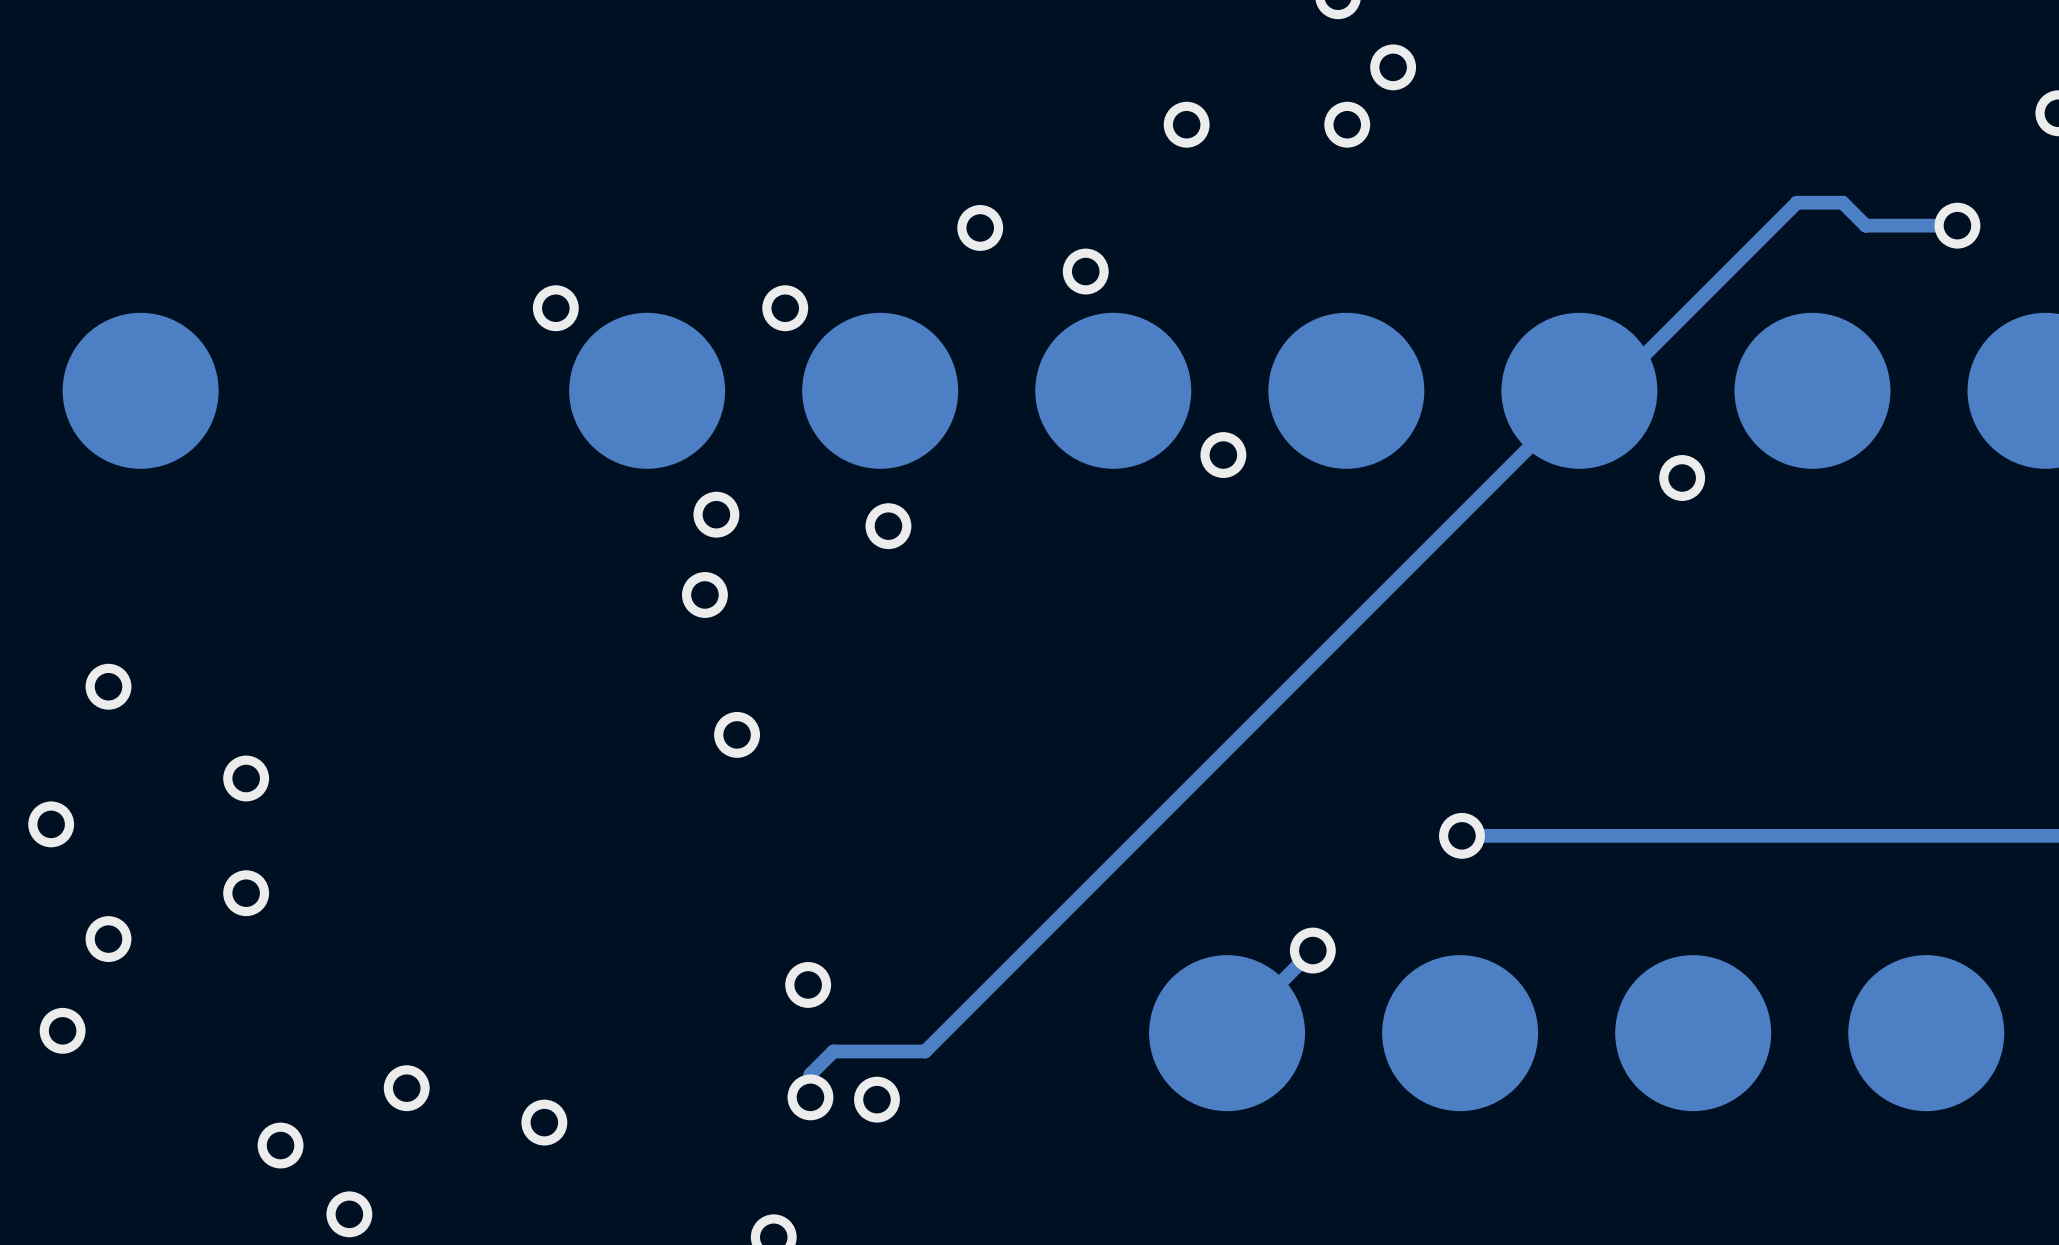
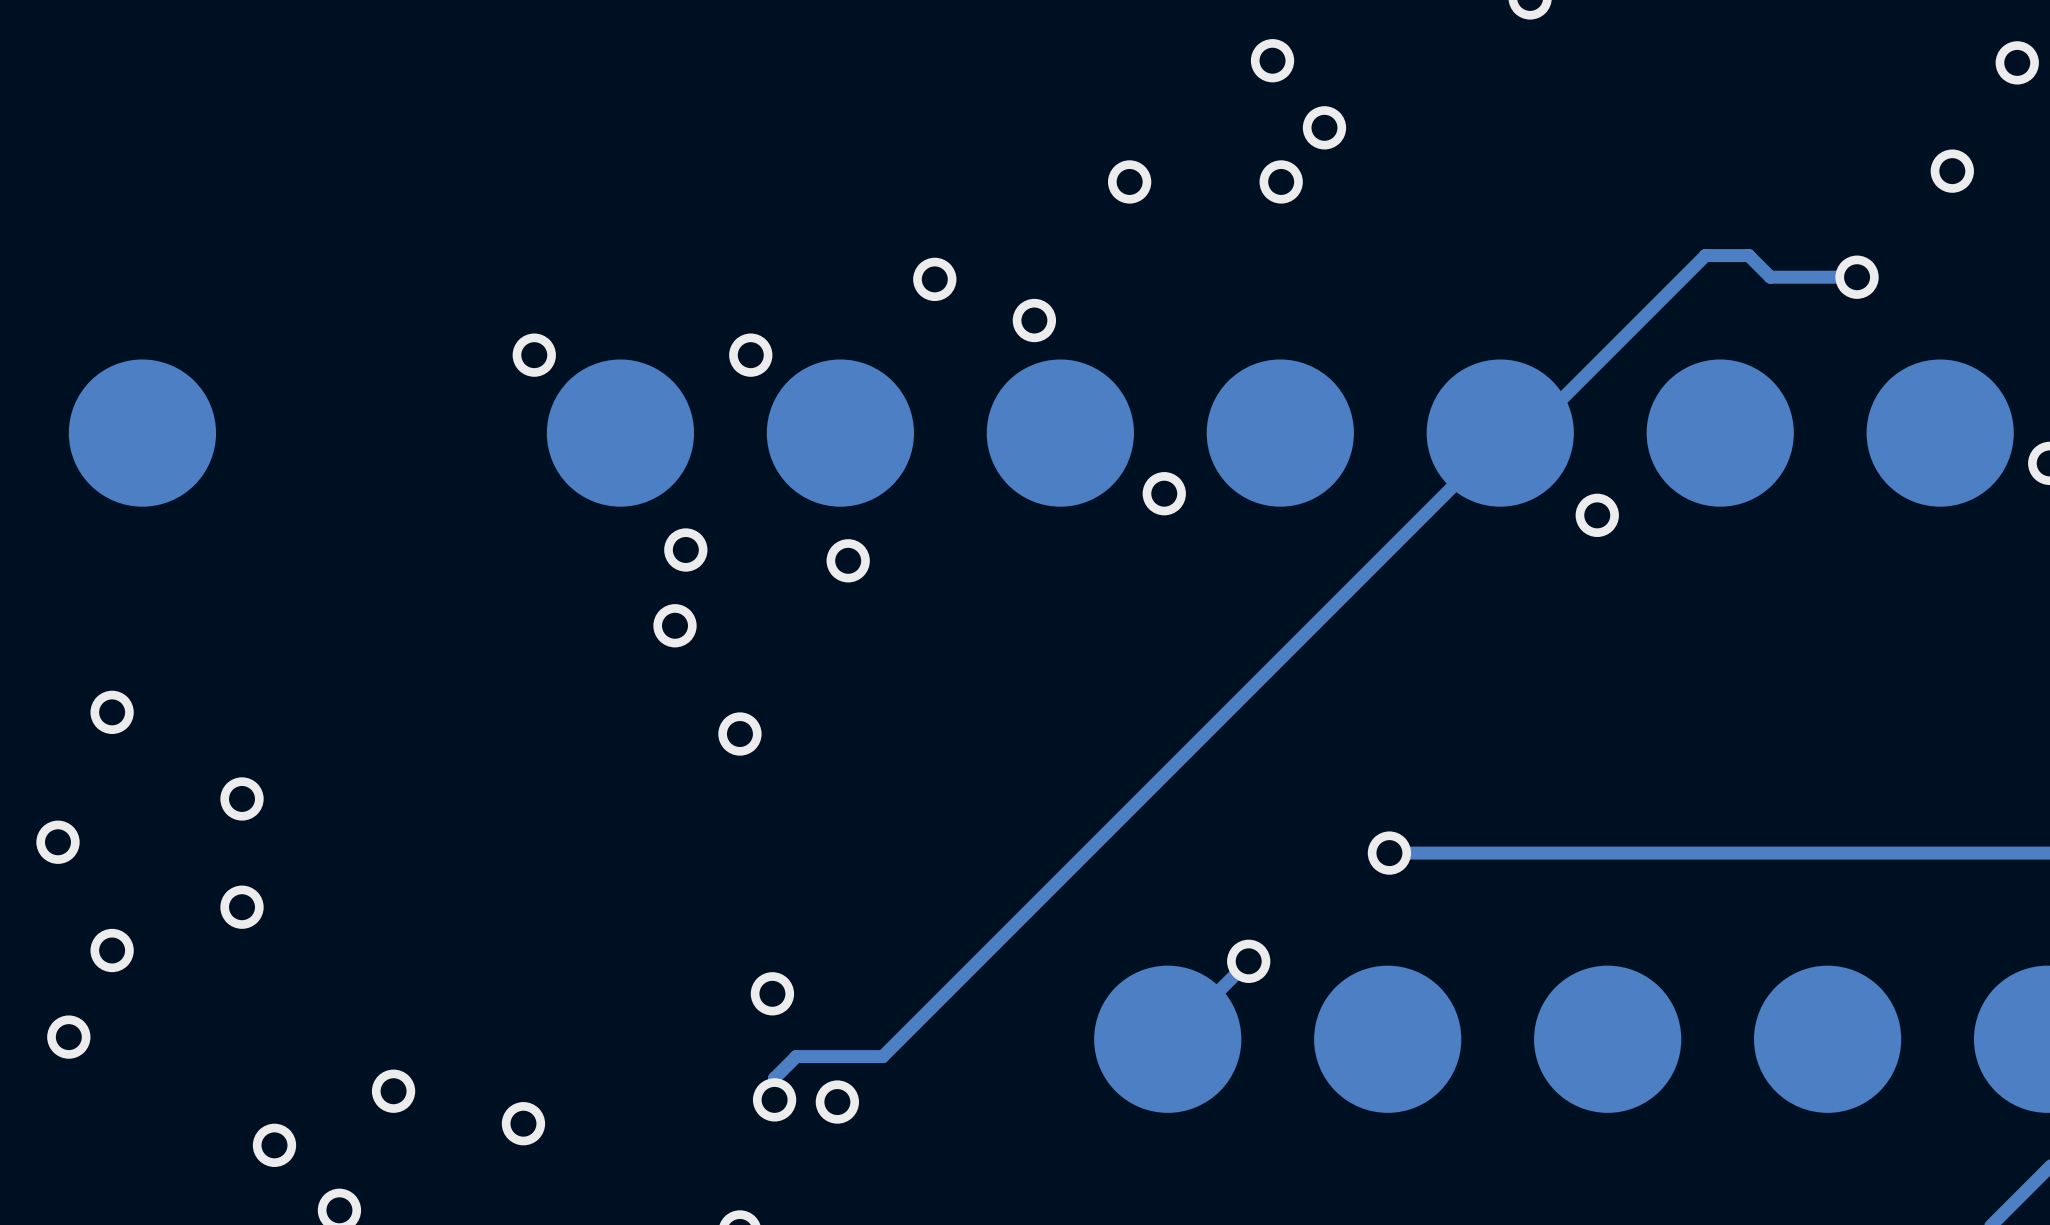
via position: (737, 734) -> (739, 734)

